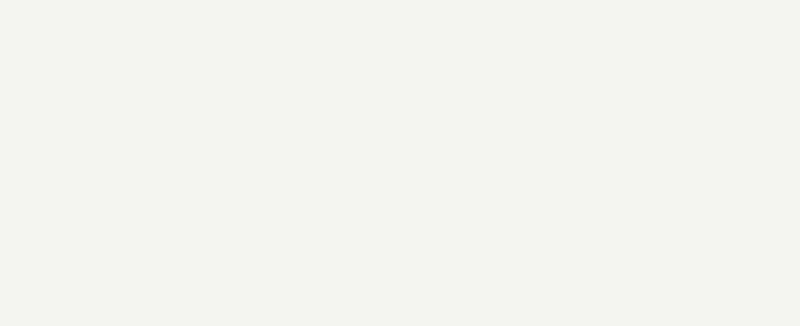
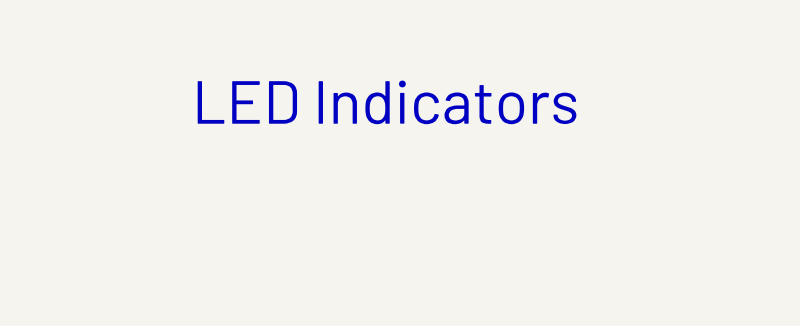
text: none -> LED Indicators (387, 102)

